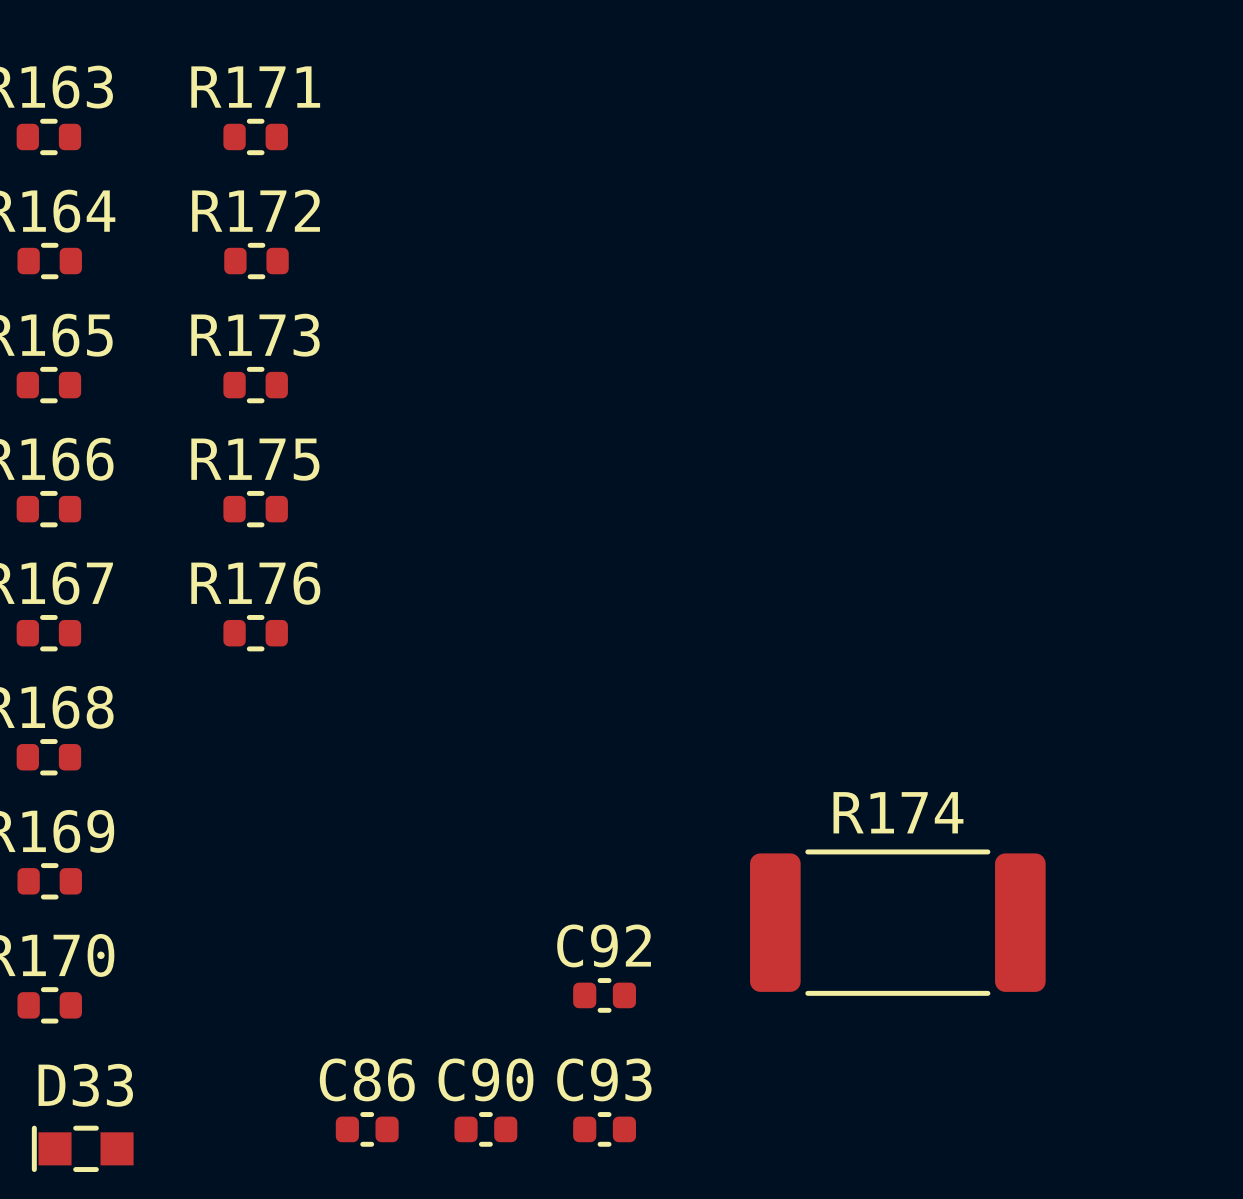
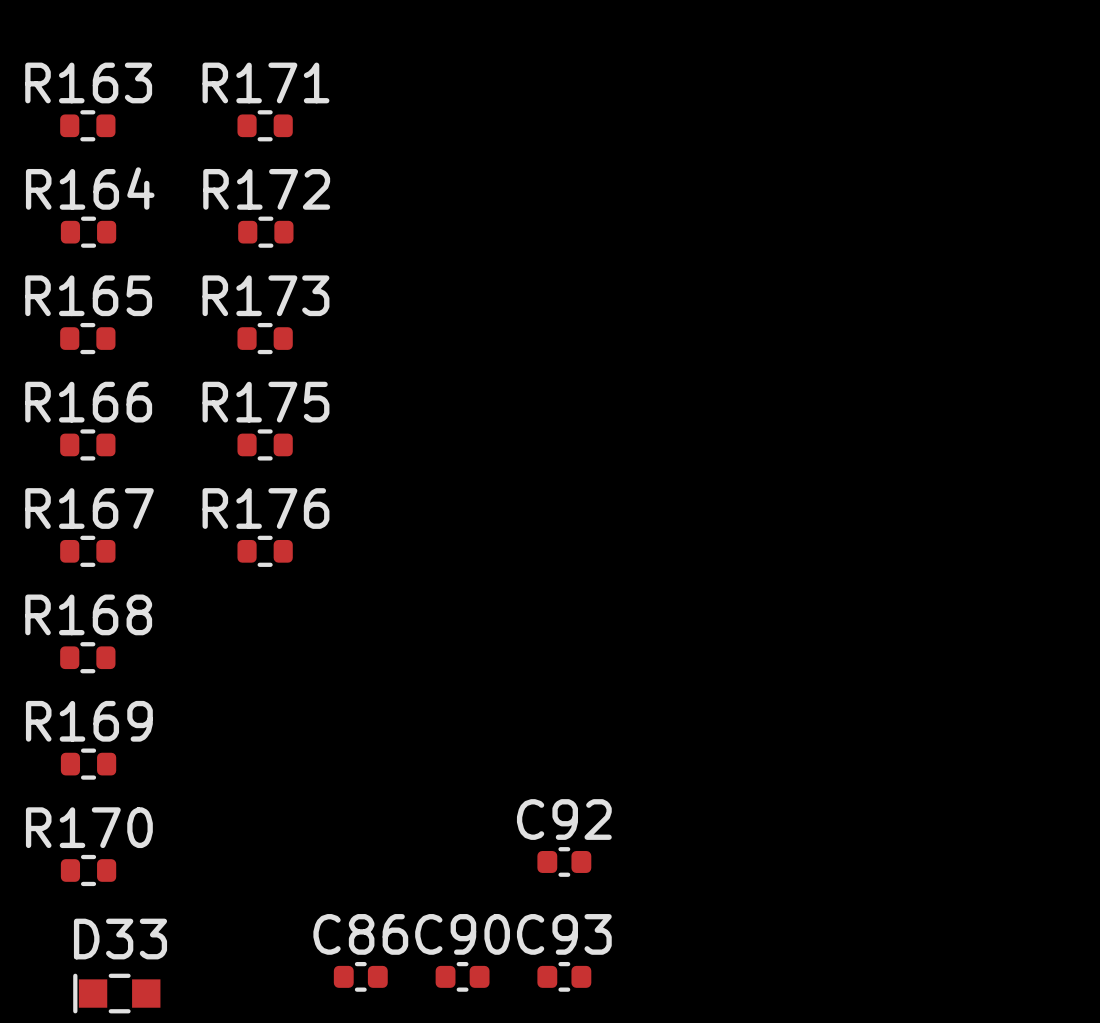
R174: (897, 922) -> none

